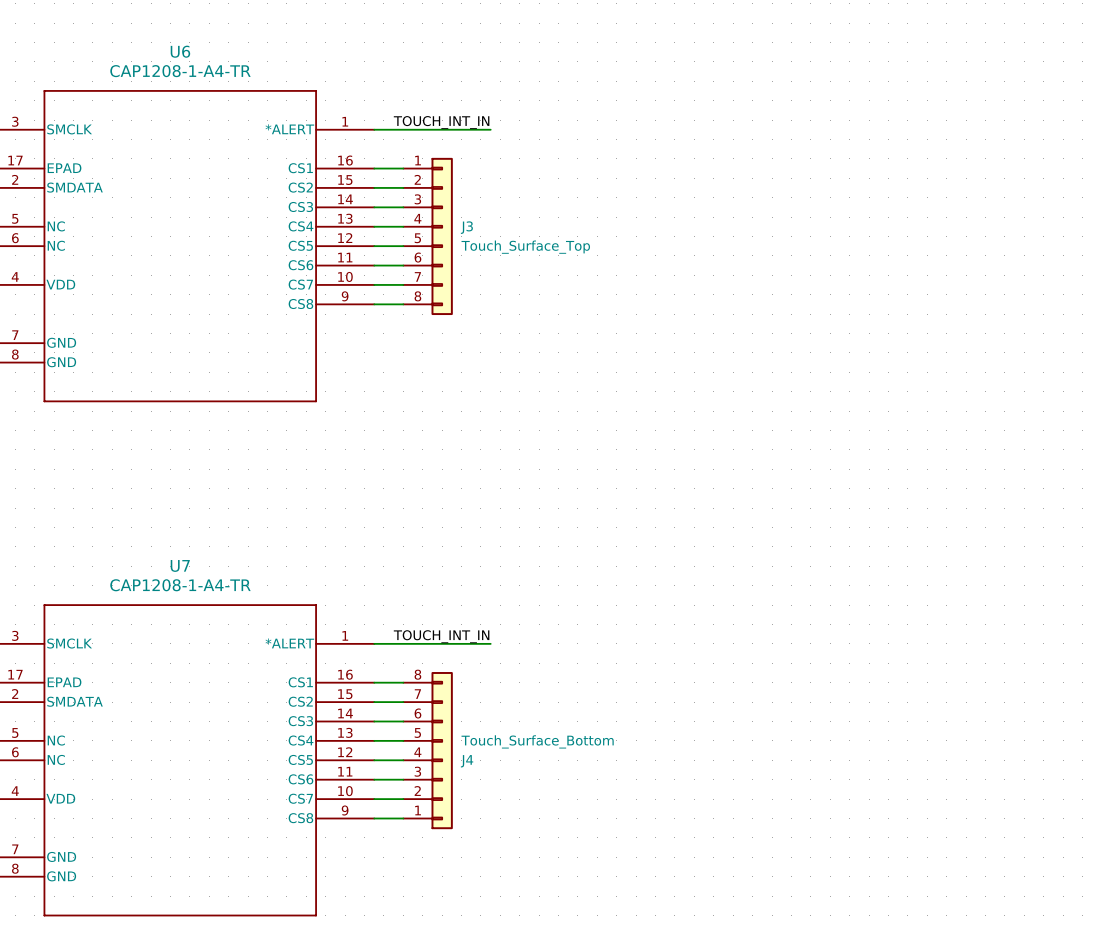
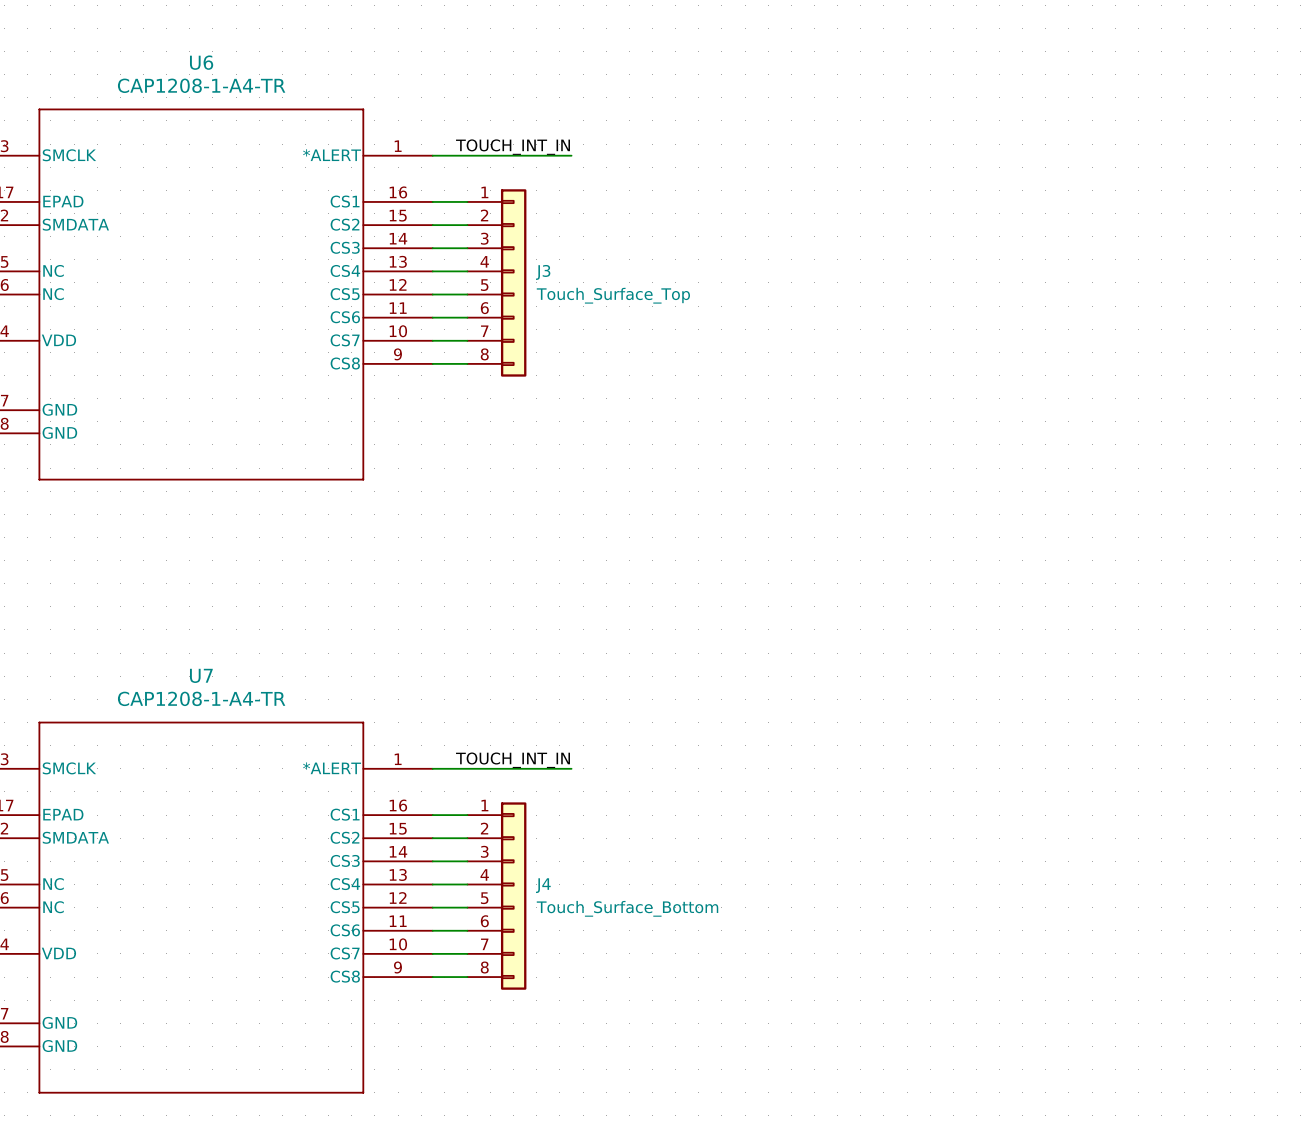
J4 flip: as is (442, 750) -> up-down (513, 896)

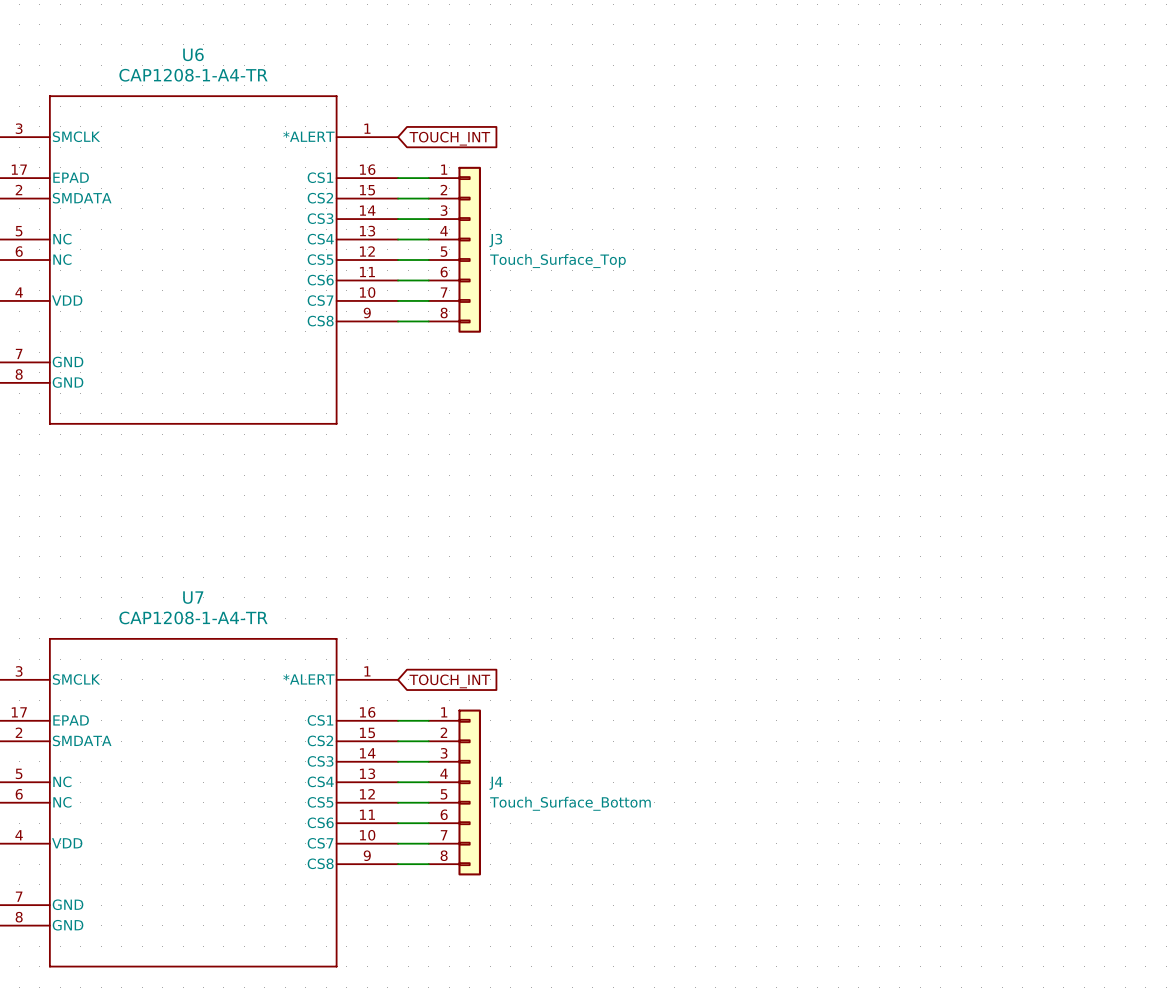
label: TOUCH_INT_IN (513, 147) -> none
wire: (432, 155) (571, 155) -> none
global label: none -> TOUCH_INT (449, 138)
label: TOUCH_INT_IN (513, 760) -> none
wire: (432, 768) (571, 768) -> none
global label: none -> TOUCH_INT (449, 681)

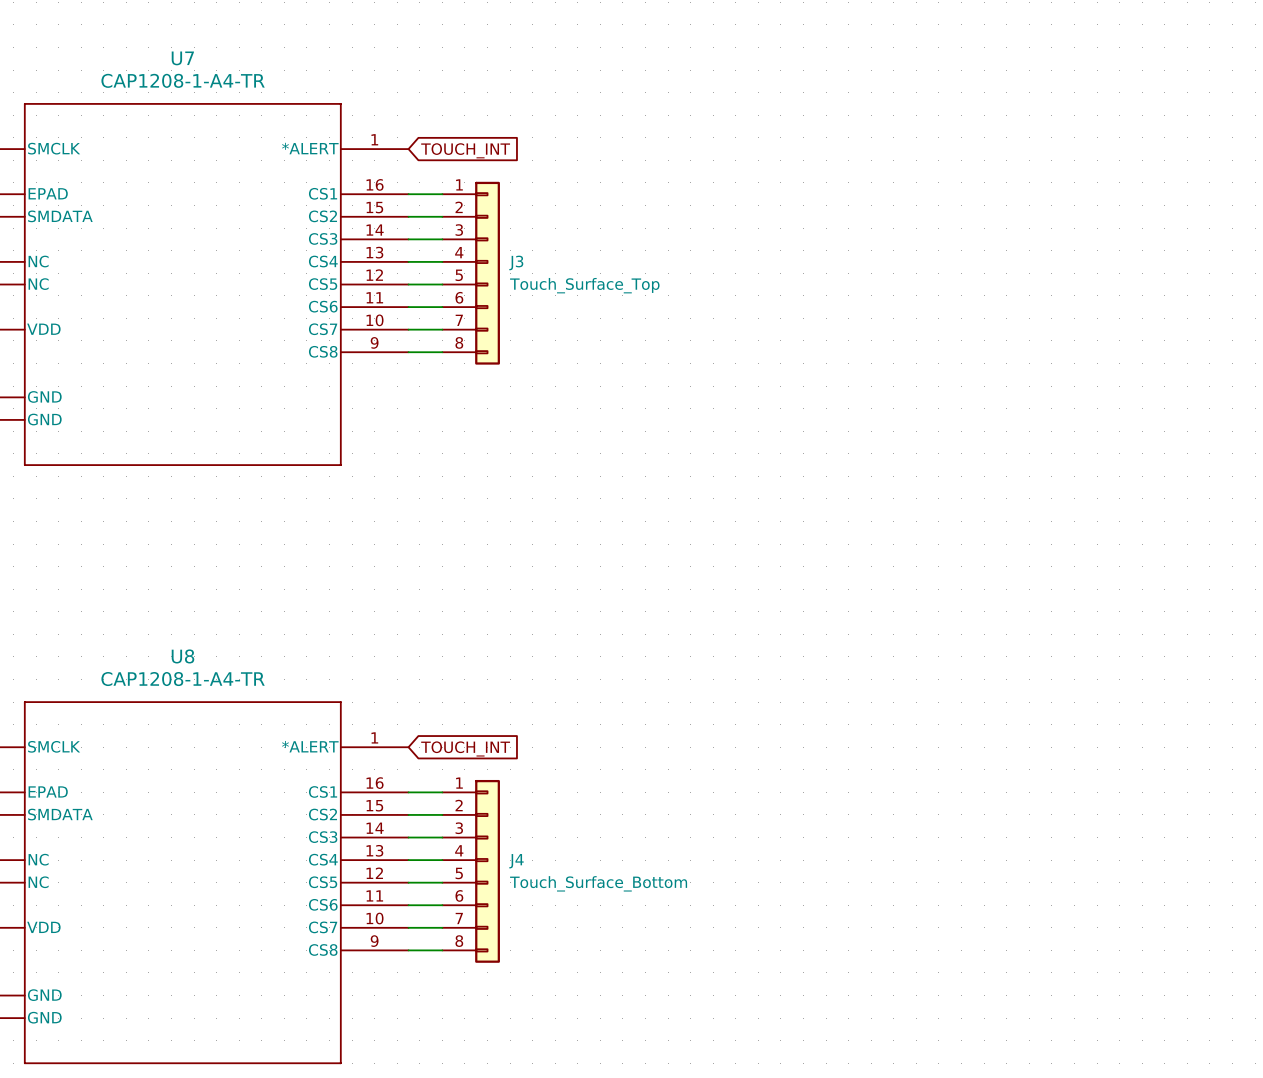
U6 name: U6 (193, 54) -> U7 (182, 58)
U7 name: U7 (193, 597) -> U8 (182, 656)

